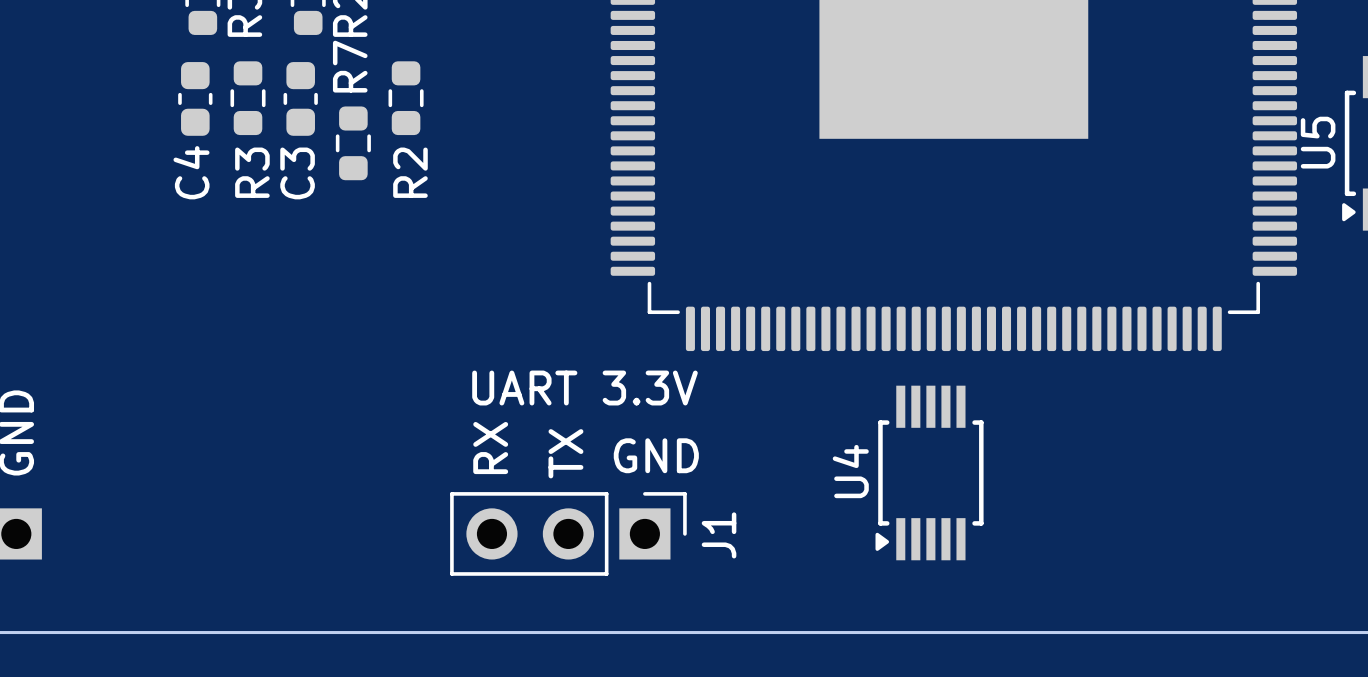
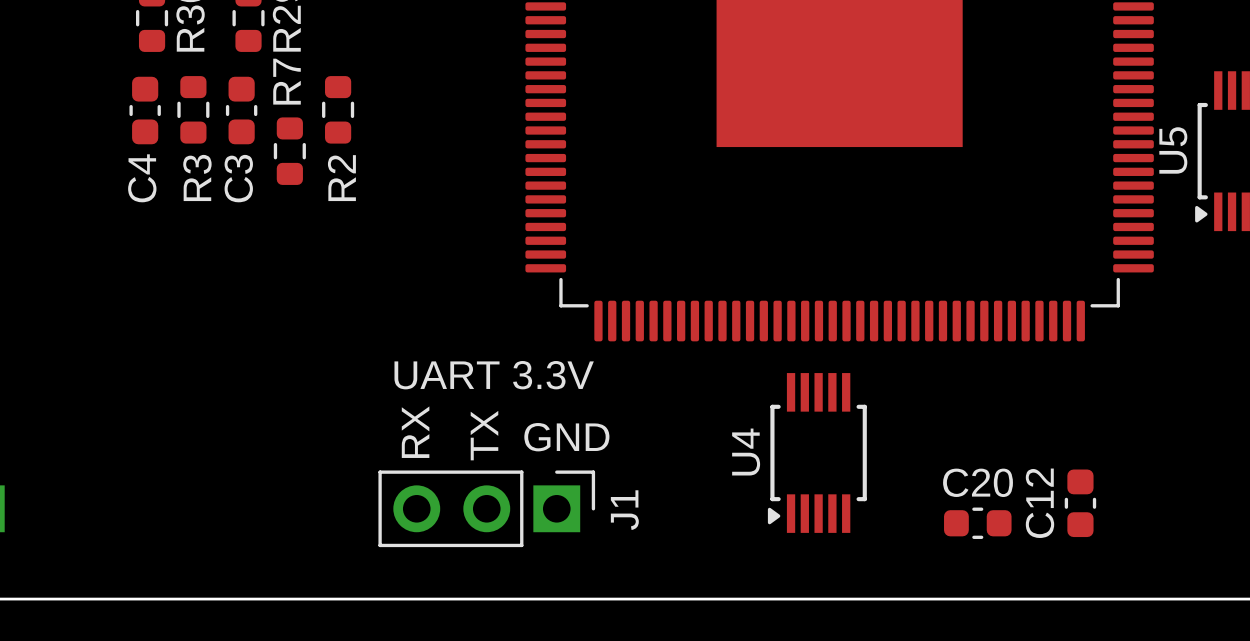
C12: none -> (1080, 503)
C20: none -> (977, 523)

